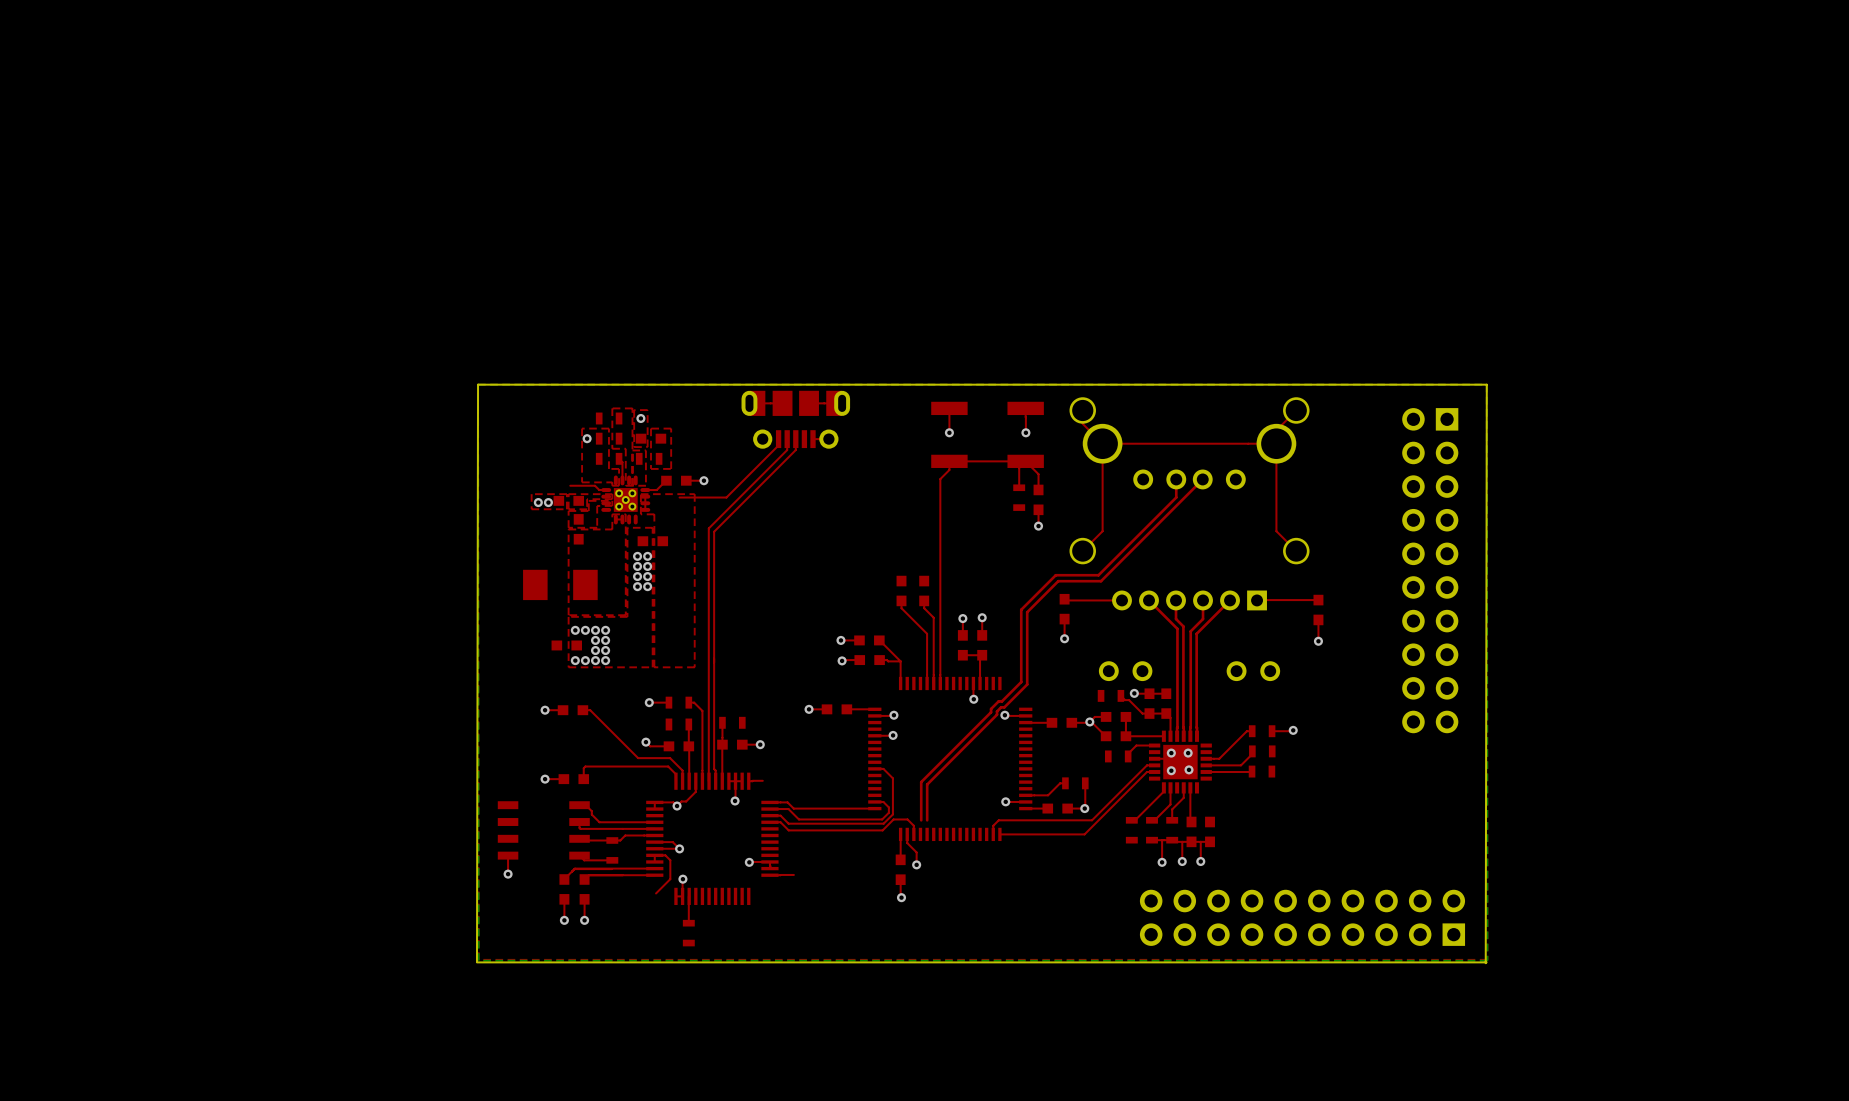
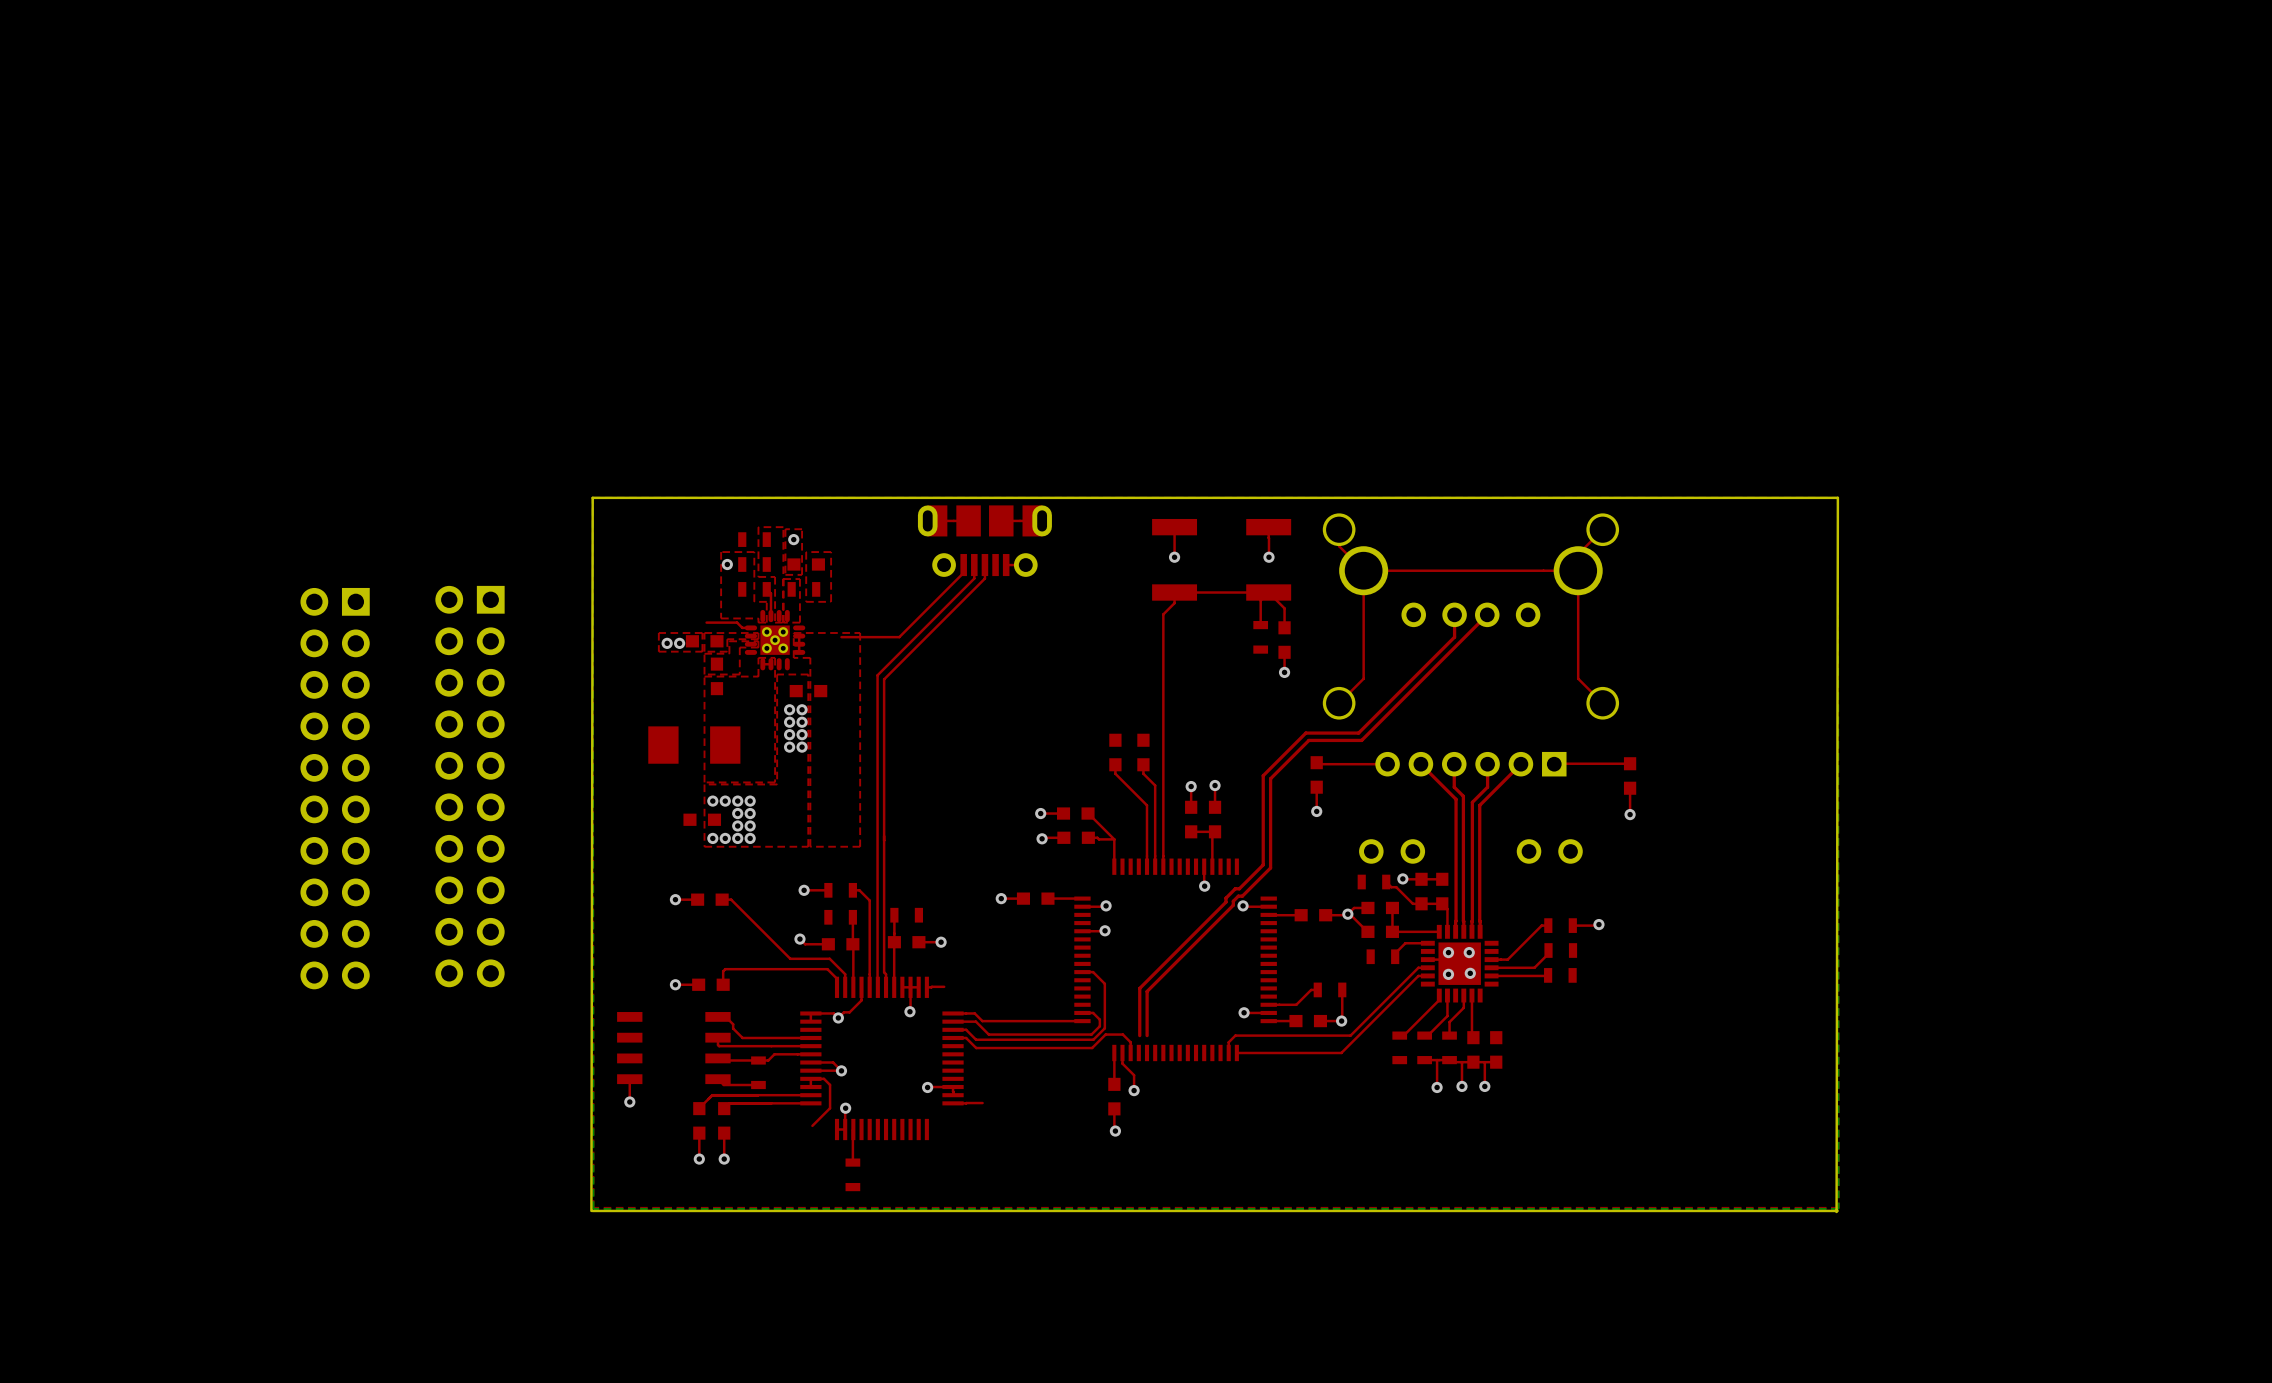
top track: (666, 480) (656, 490) (645, 490) -> none
part: (676, 480) -> none
top track: (703, 480) (686, 480) -> none
via: (703, 480) -> none
part: (1430, 570) -> none
part: none -> (470, 786)
part: none -> (335, 788)
part: (1302, 917) -> none

